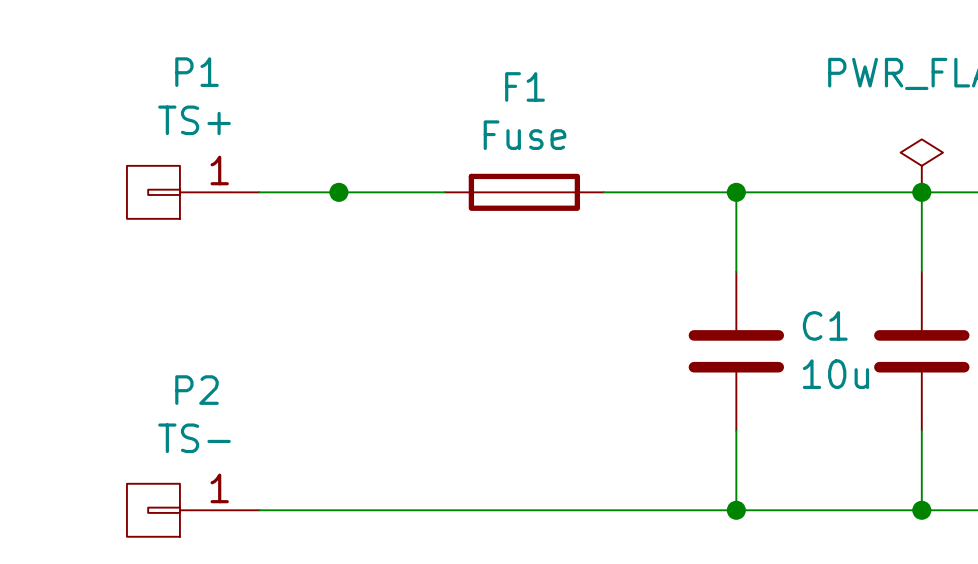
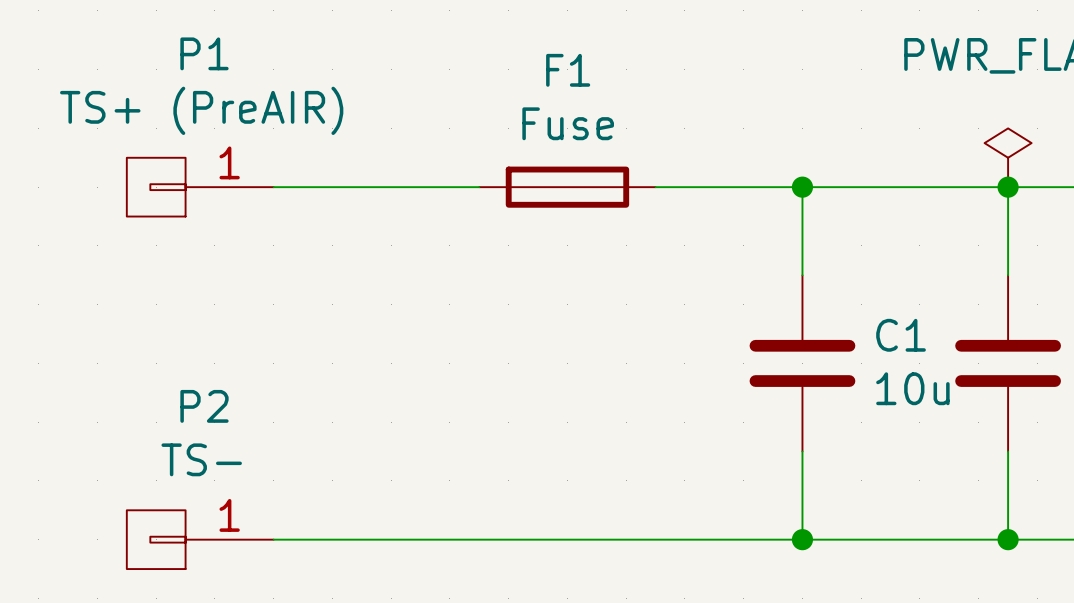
P1 value: TS+ (194, 120) -> TS+ (PreAIR) (201, 110)
junction: (338, 192) -> none

